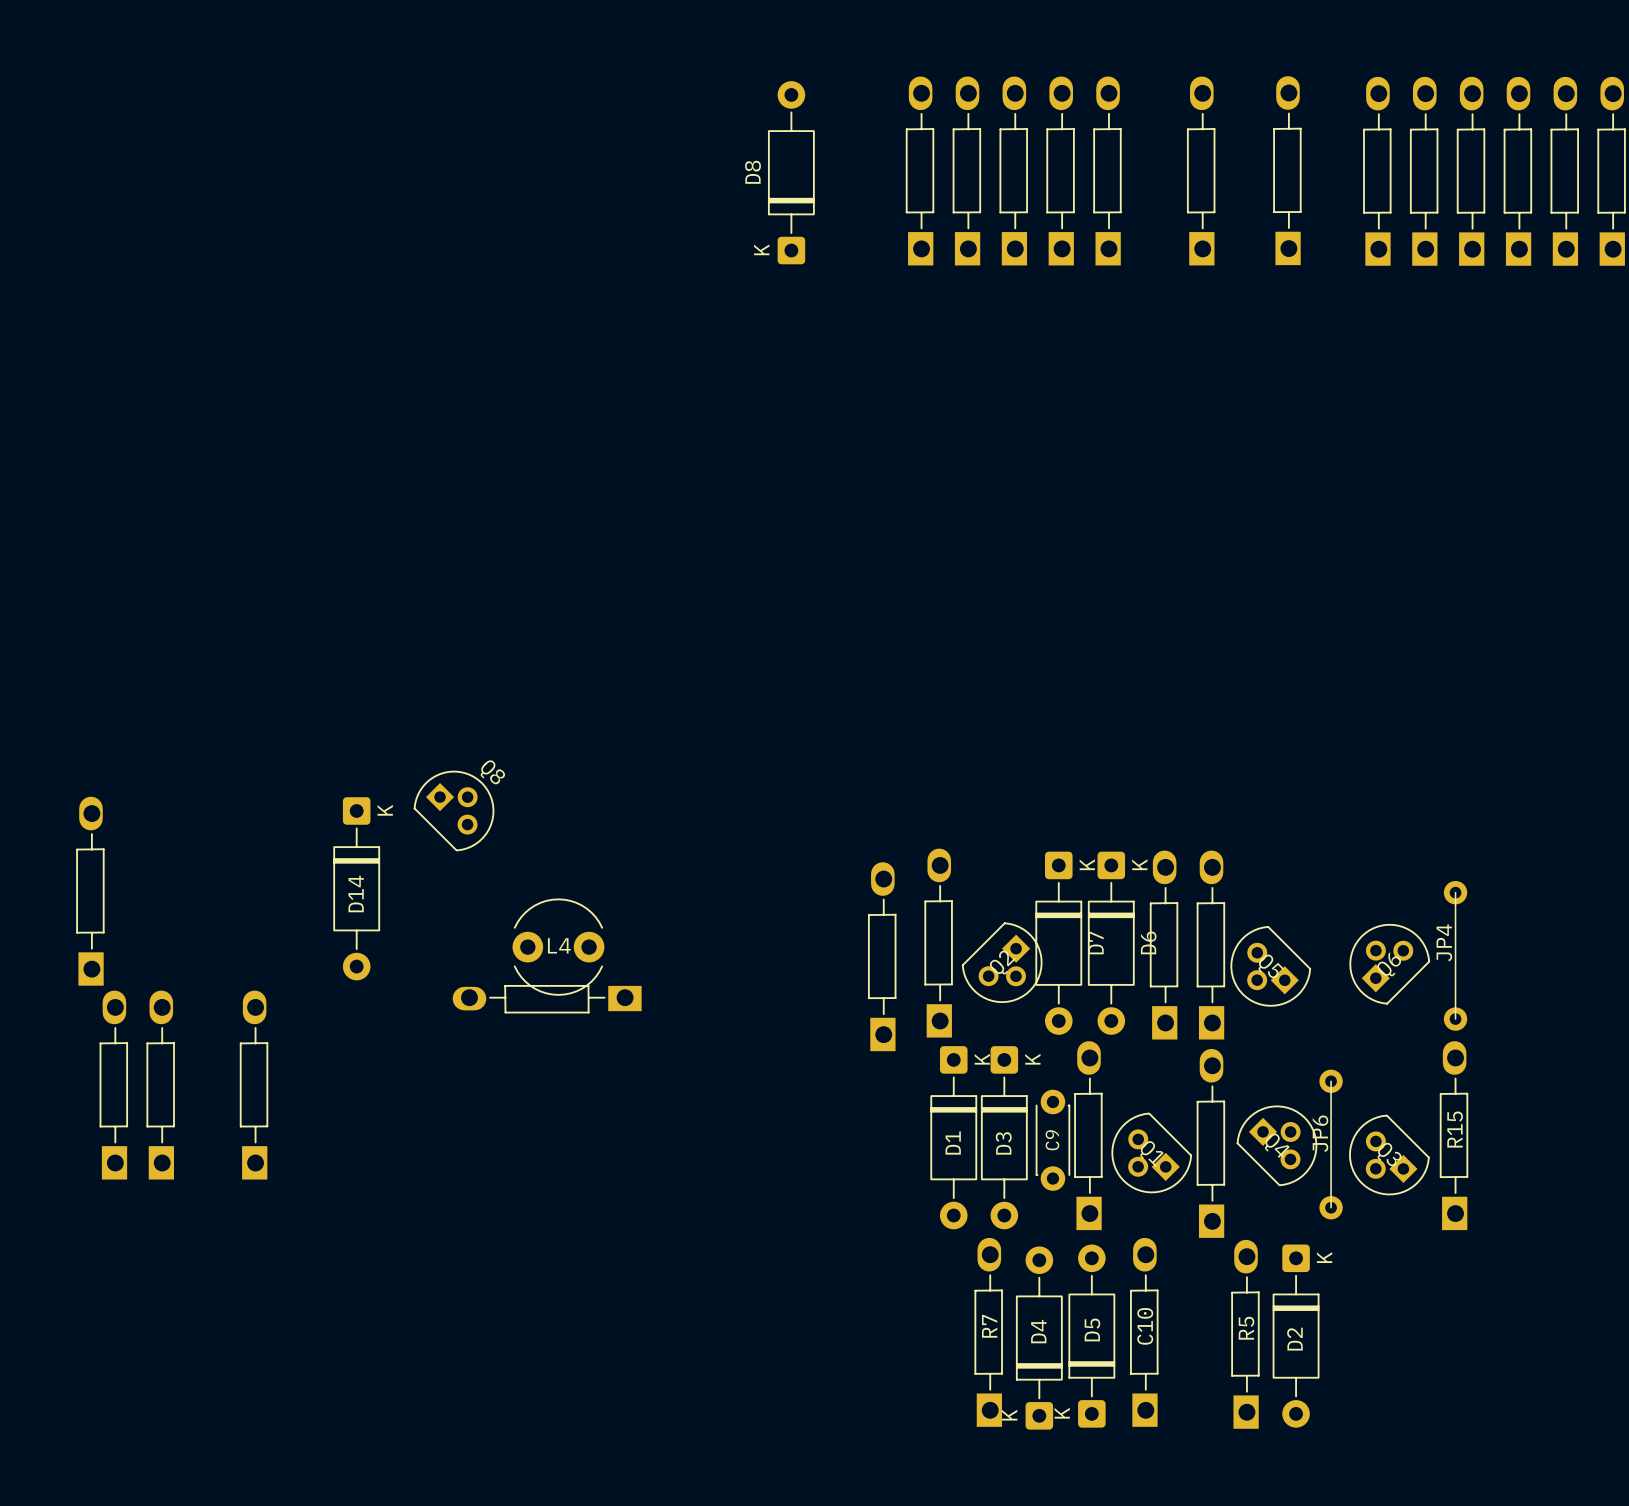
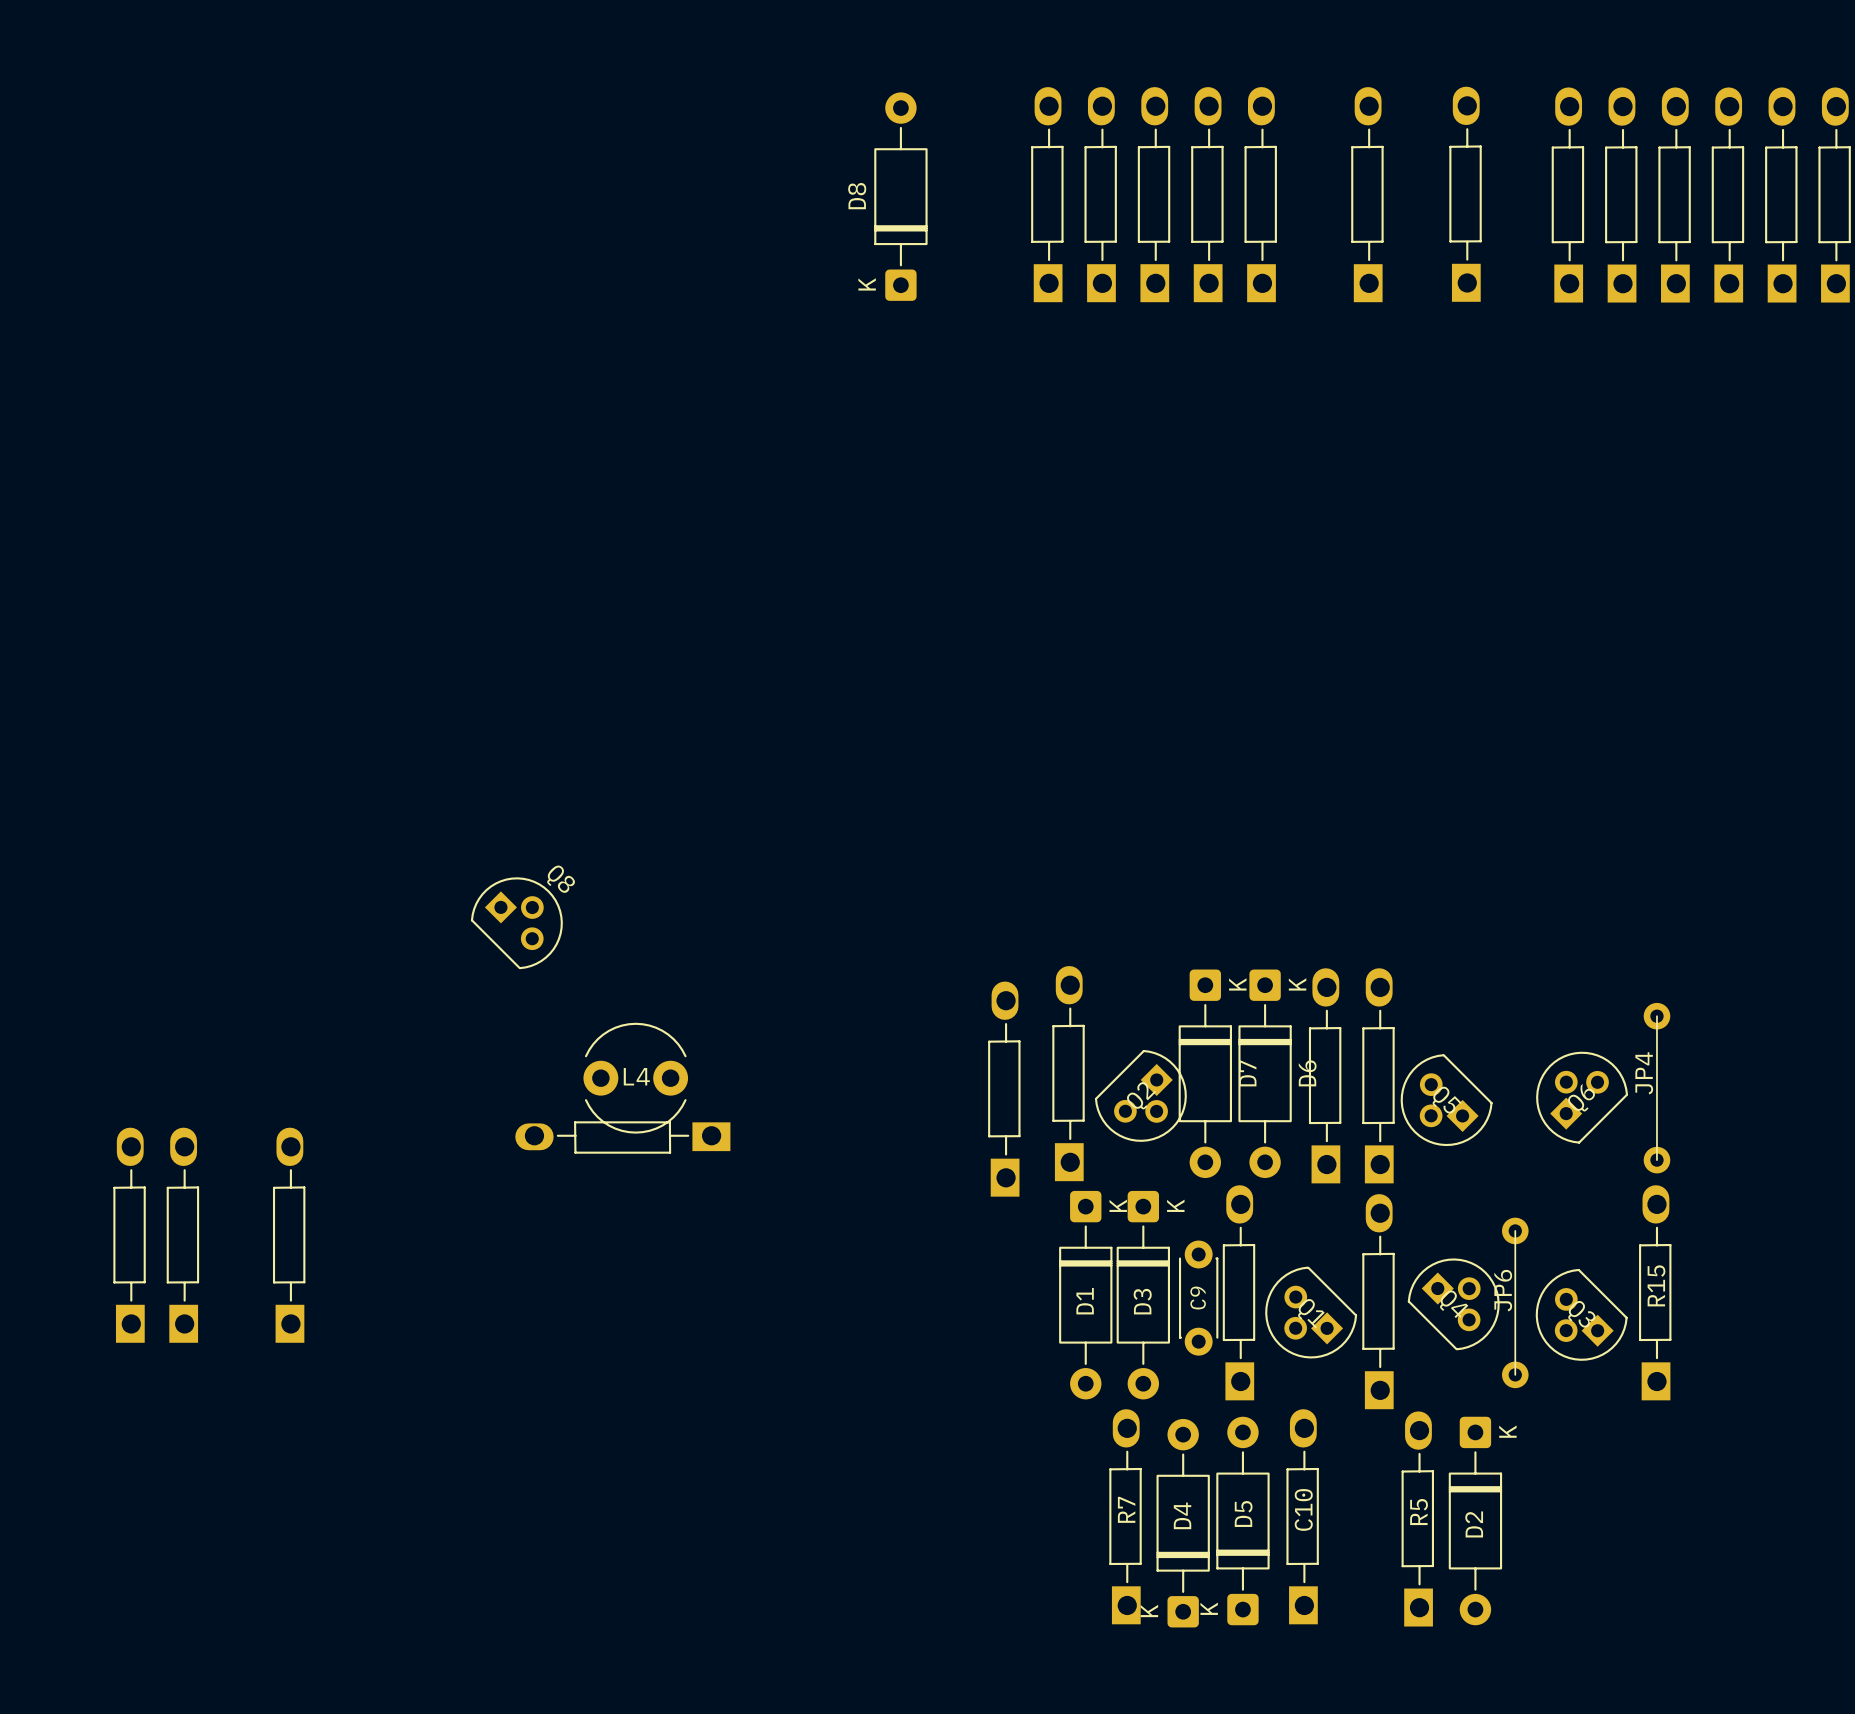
D14: (356, 888) -> none
part: (90, 891) -> none

